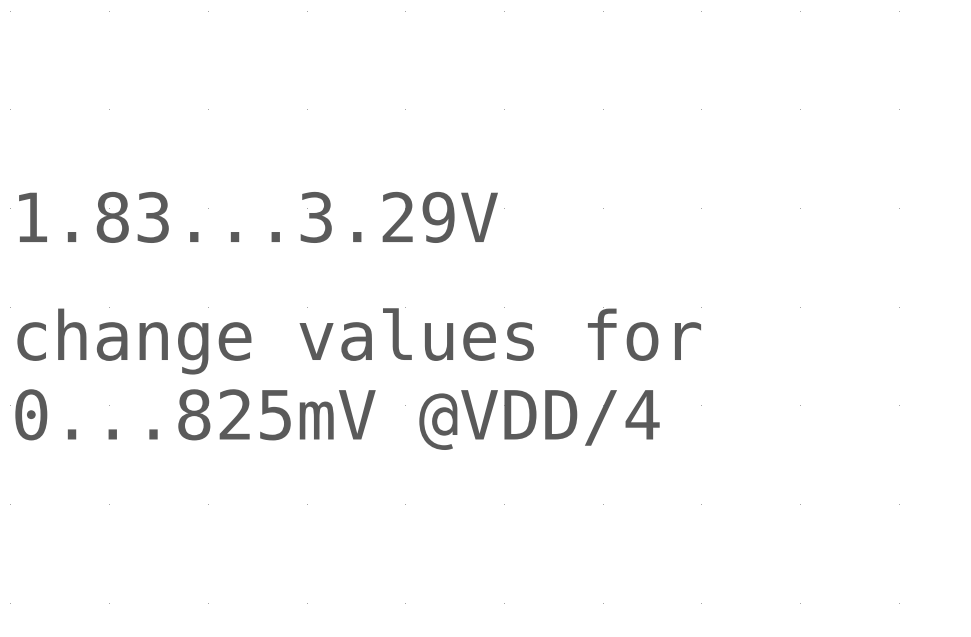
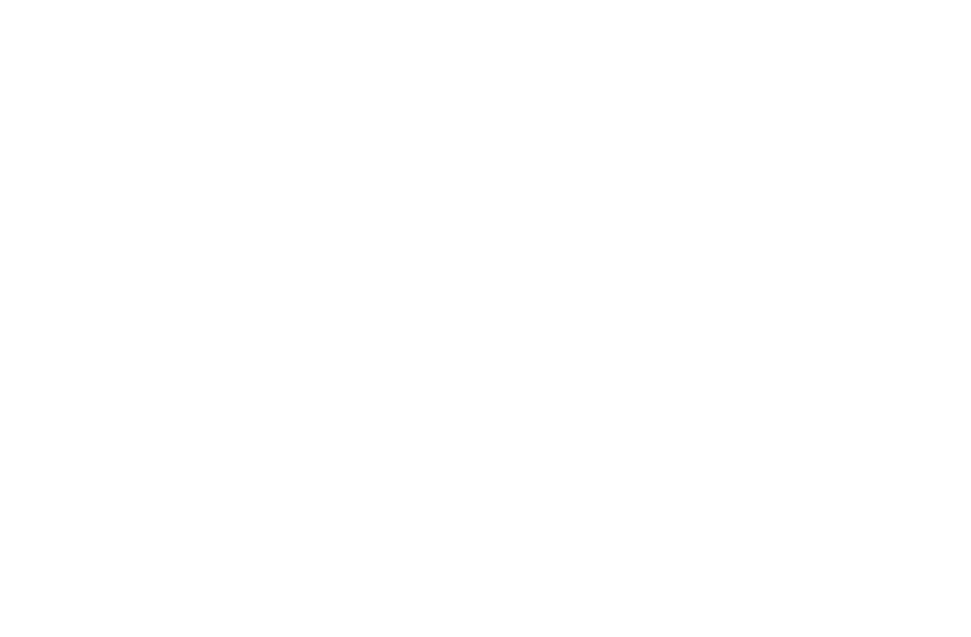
text: 1.83...3.29V (258, 217) -> none
text: change values for (359, 341) -> none
text: 0...825mV @VDD/4 (337, 419) -> none

